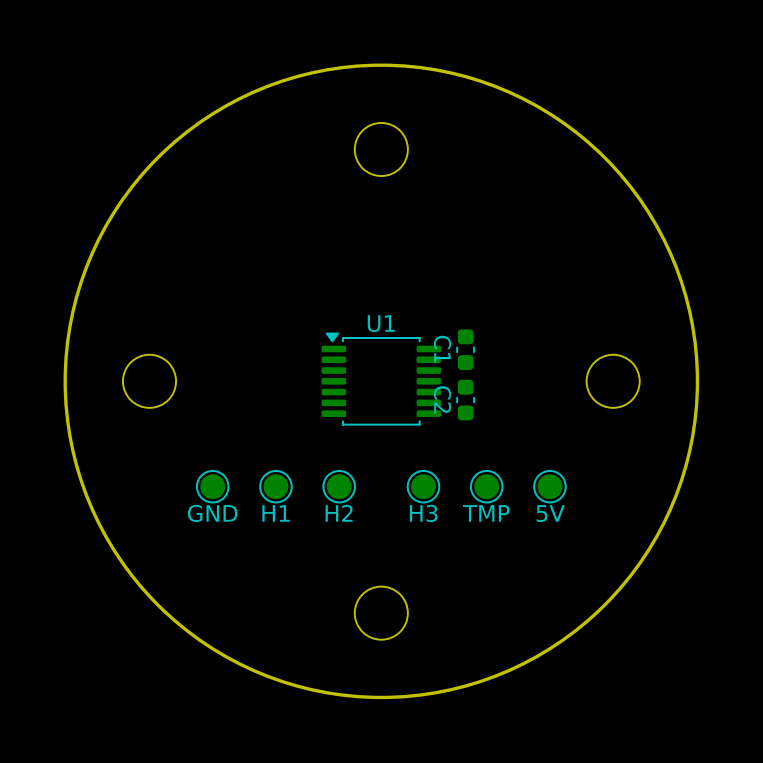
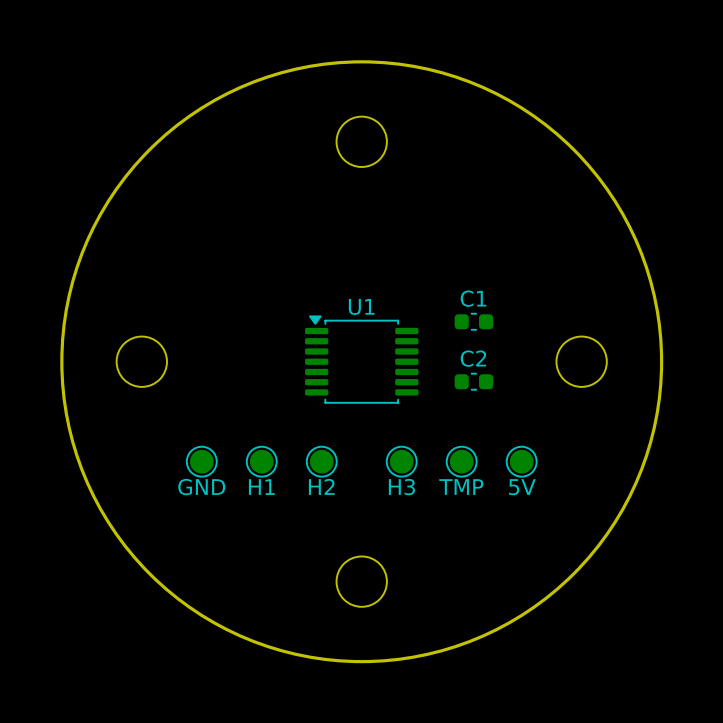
C1 rotation: 0° (465, 349) -> 90° clockwise (473, 321)
C1 position: (465, 349) -> (473, 321)
C2 rotation: 0° (465, 400) -> 90° clockwise (473, 381)
C2 position: (465, 400) -> (473, 381)

